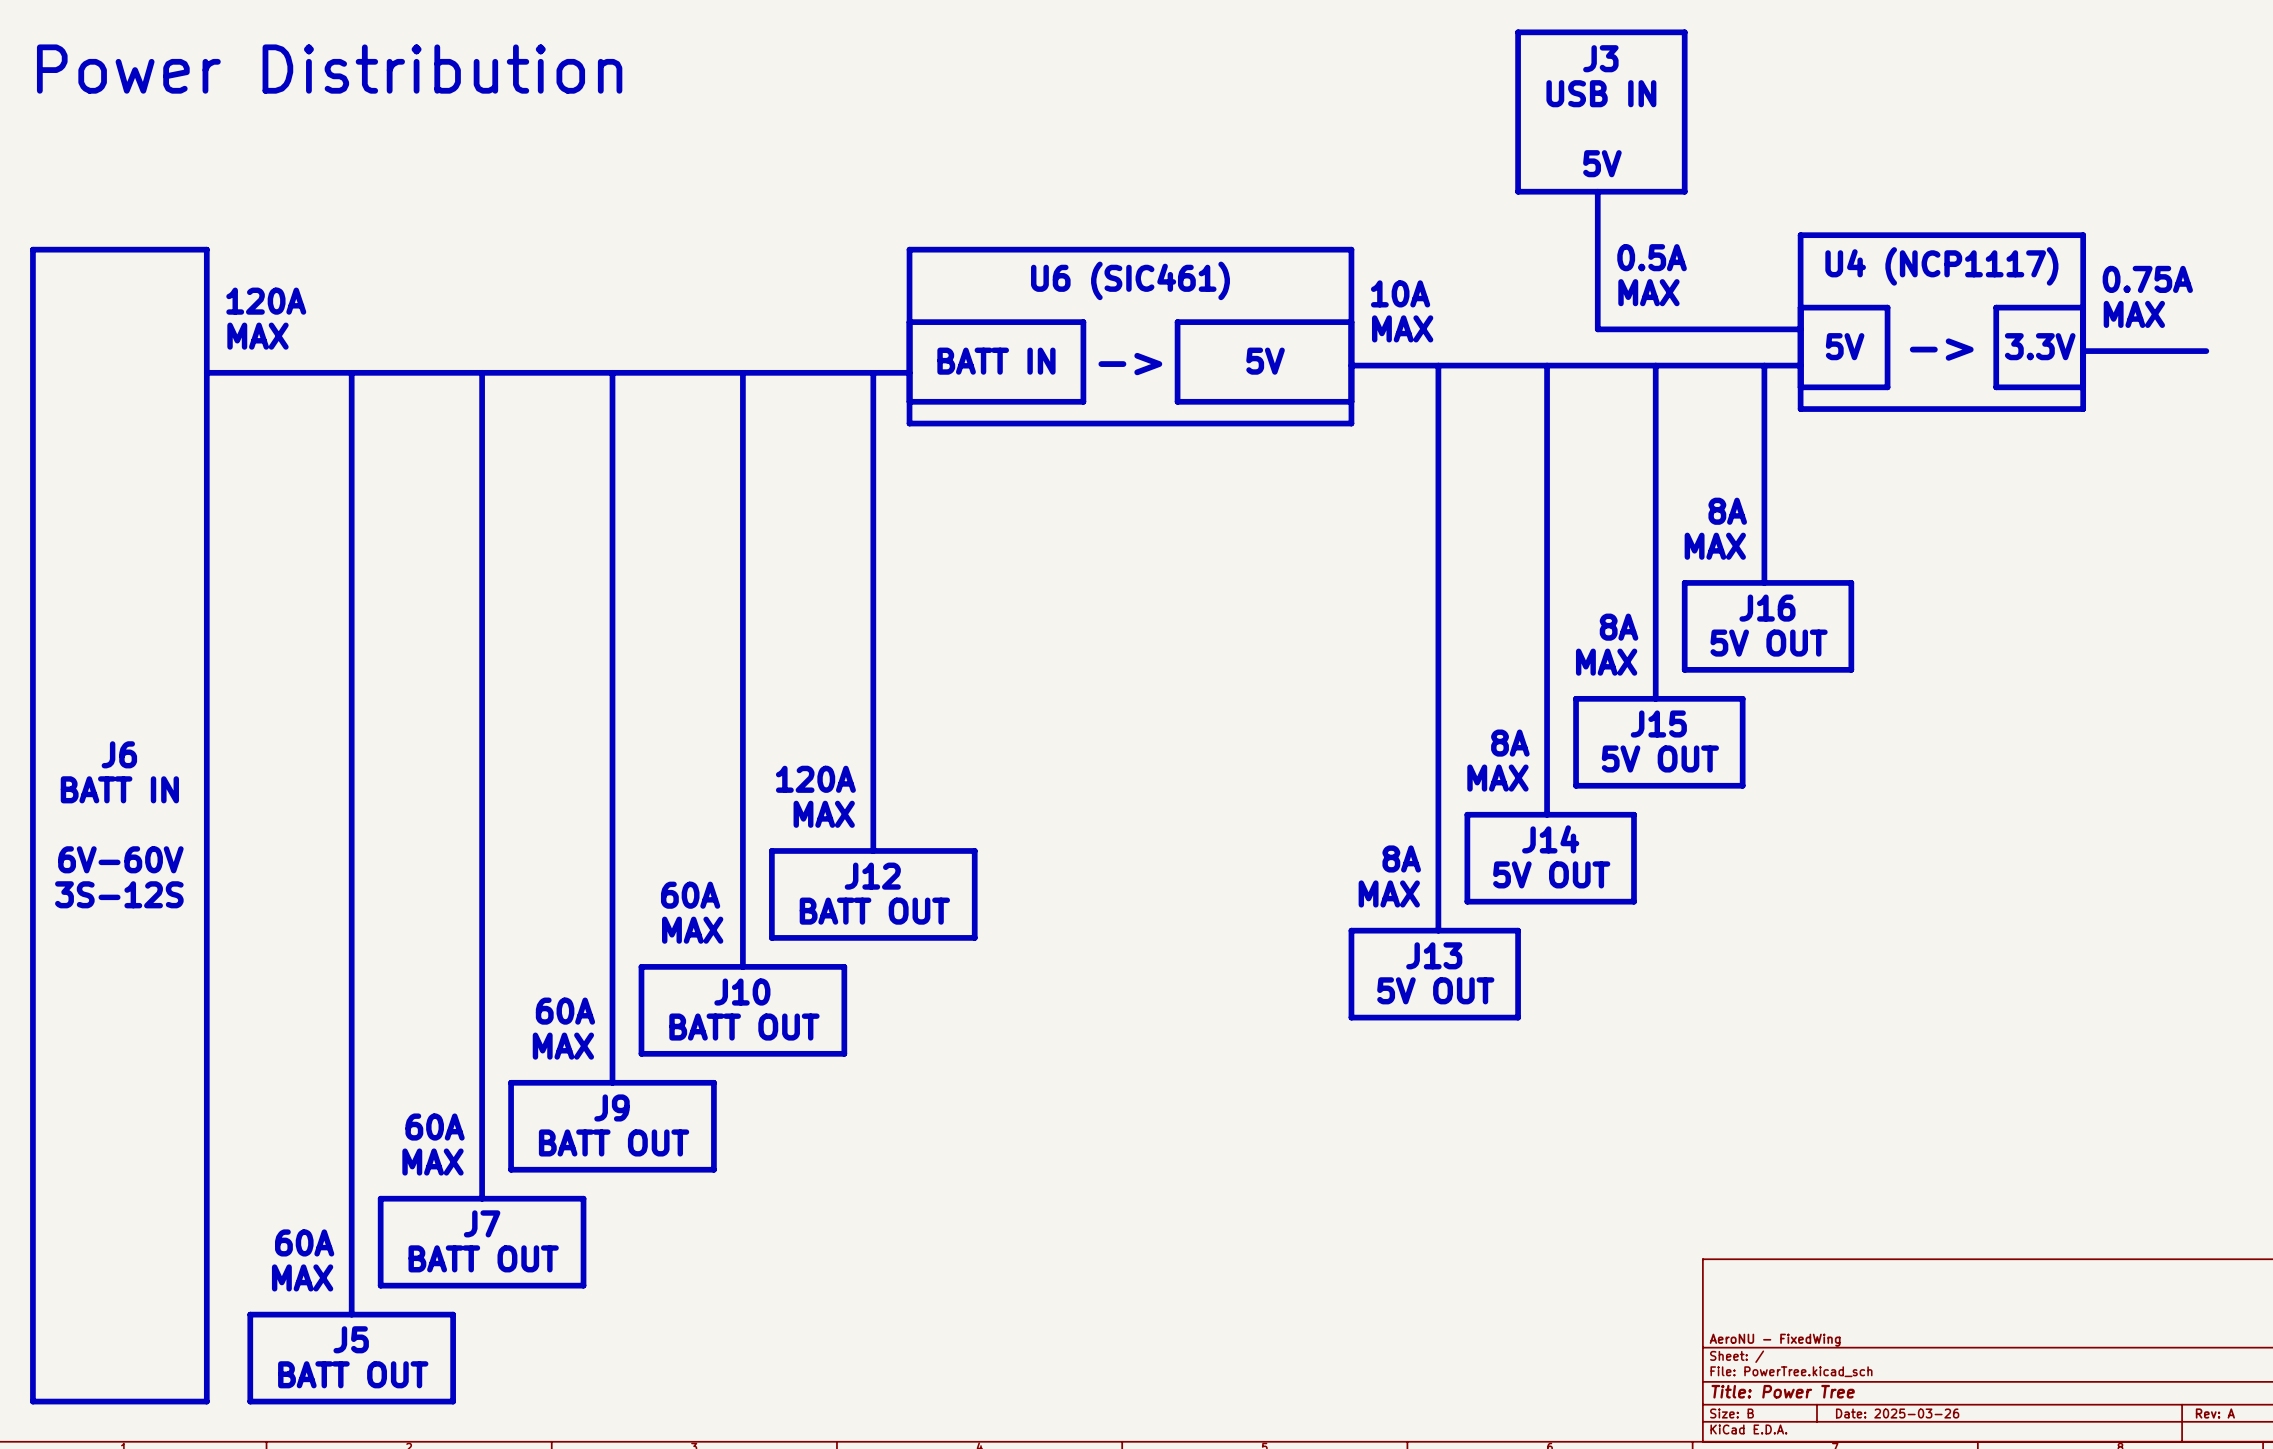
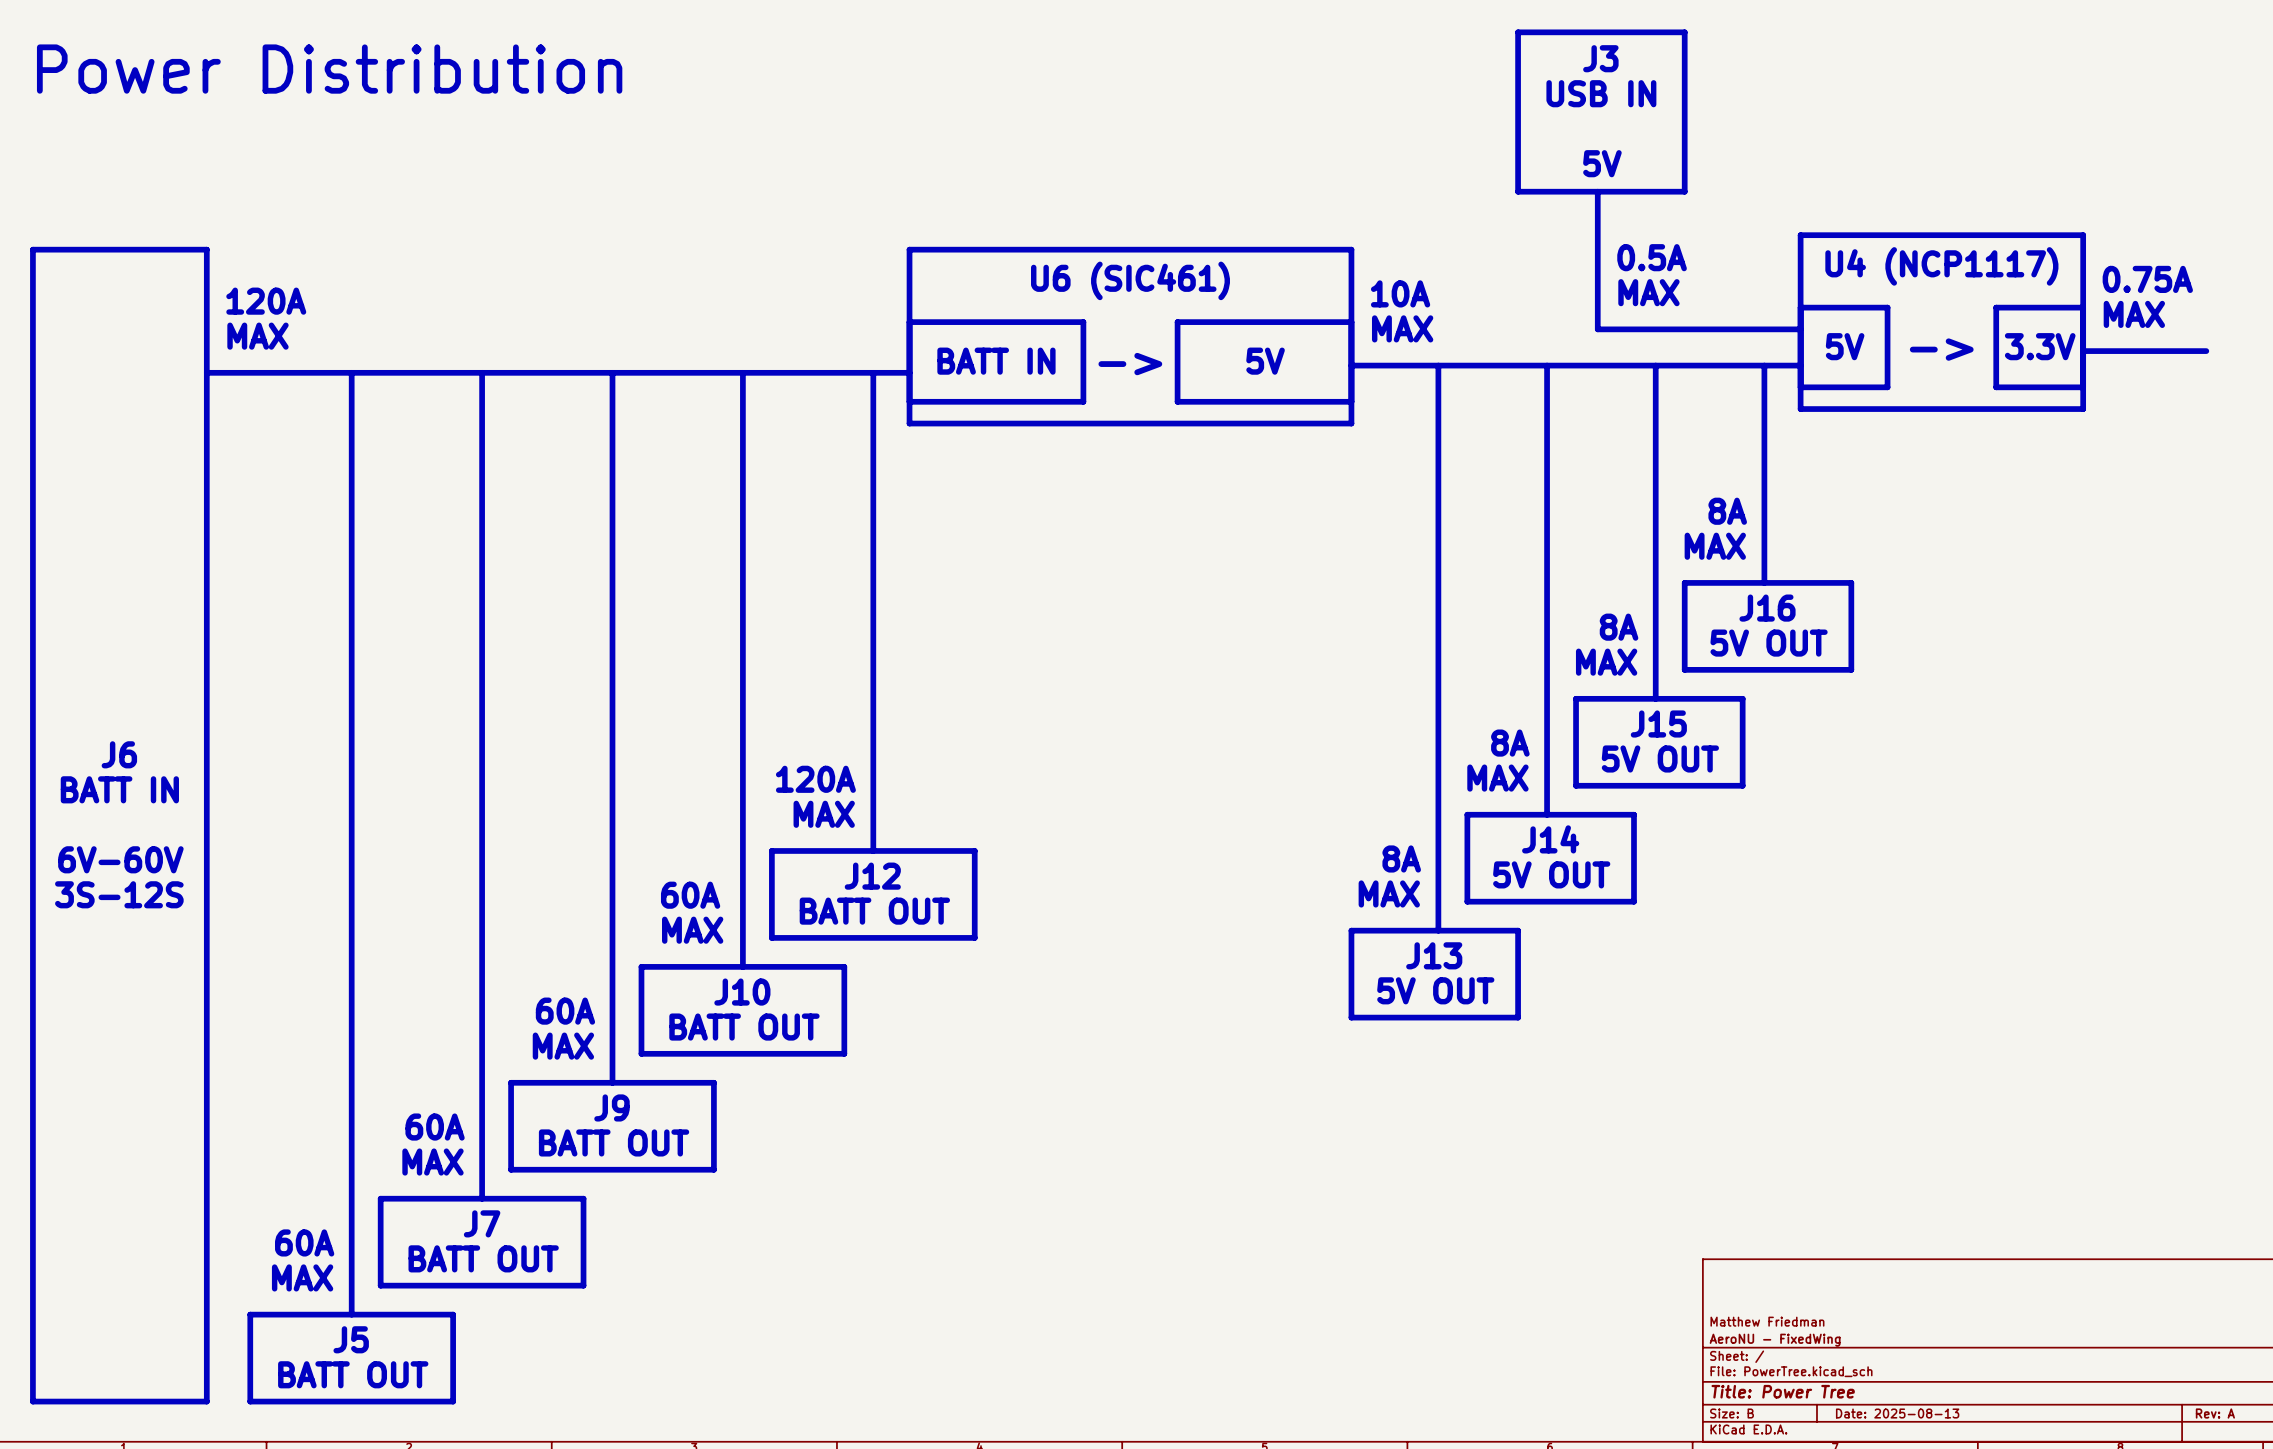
title block: none -> Matthew Friedman (1767, 1321)
title block: Date: 2025-03-26 (1897, 1413) -> Date: 2025-08-13 (1897, 1413)

